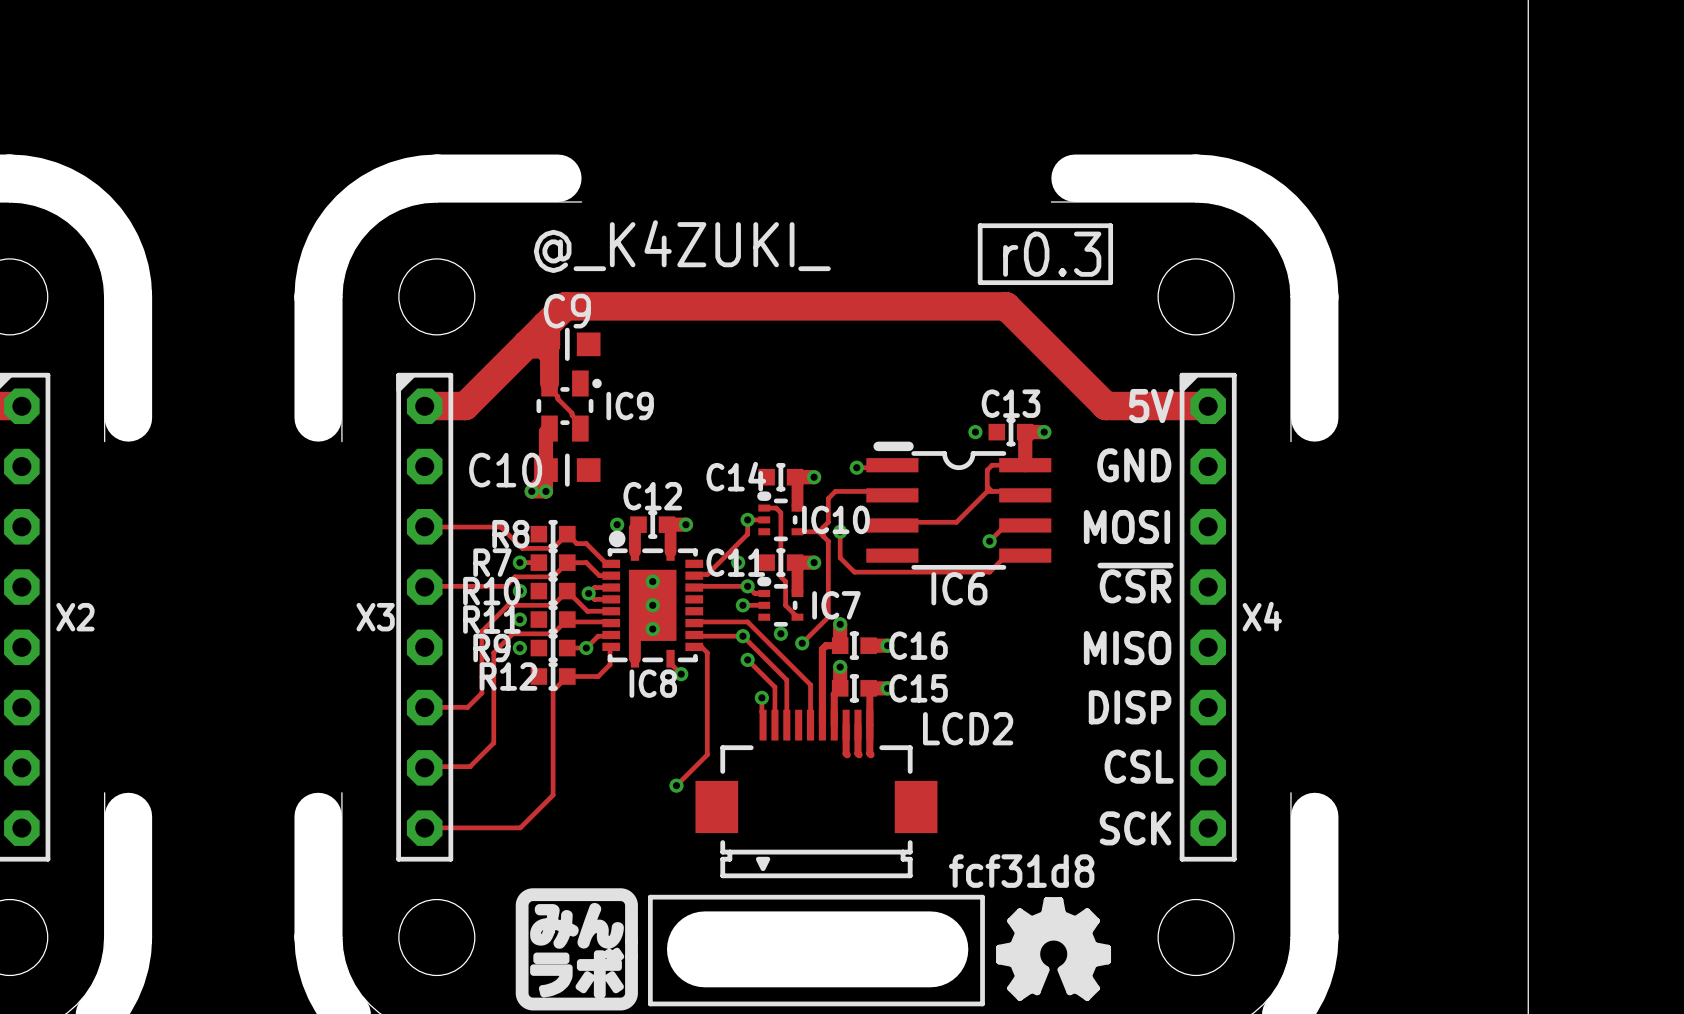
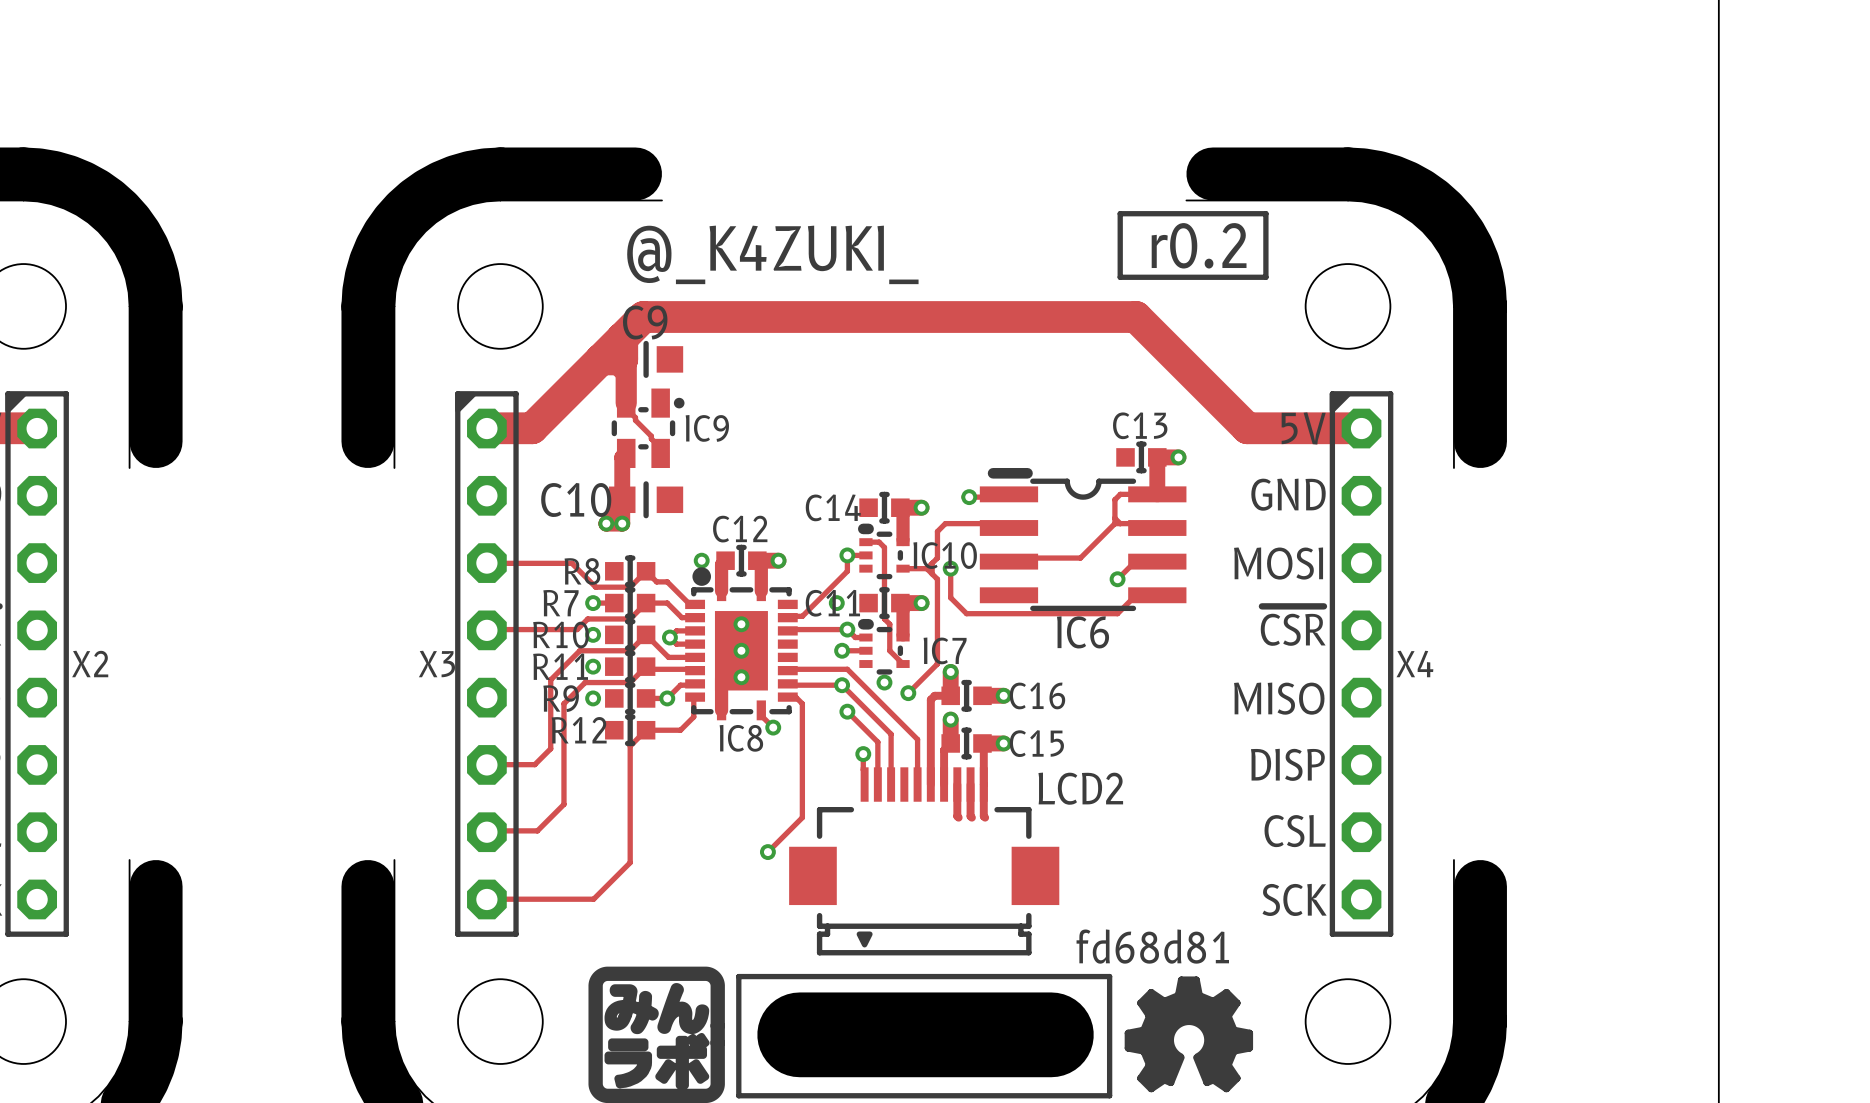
drawing shape: [977, 223, 1114, 286] -> [1117, 211, 1269, 280]
via: (975, 432) -> none
drawing shape: [948, 854, 1095, 888] -> [1076, 929, 1229, 964]

